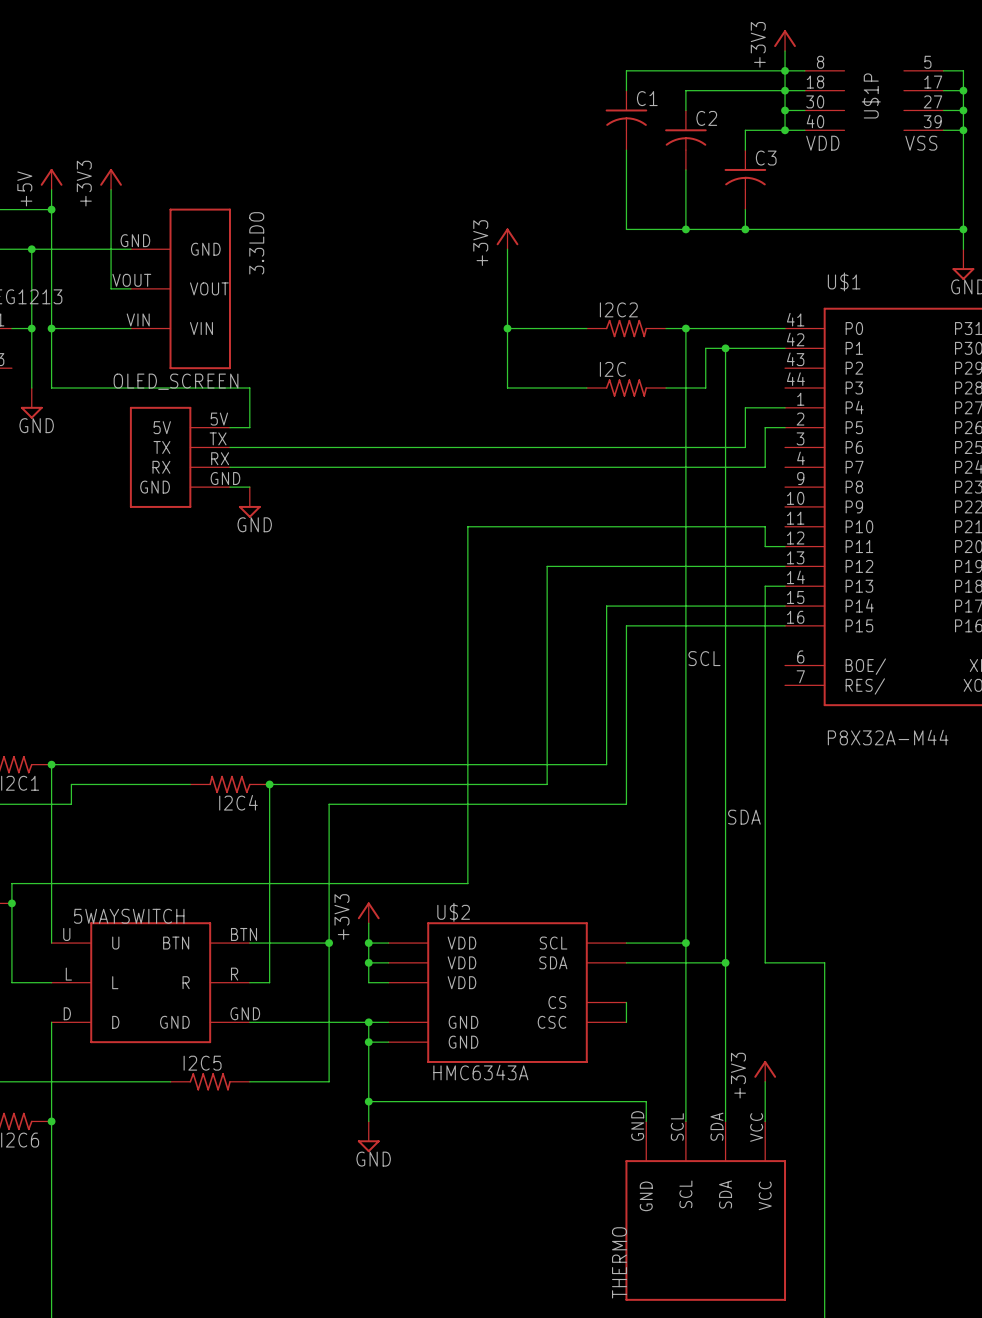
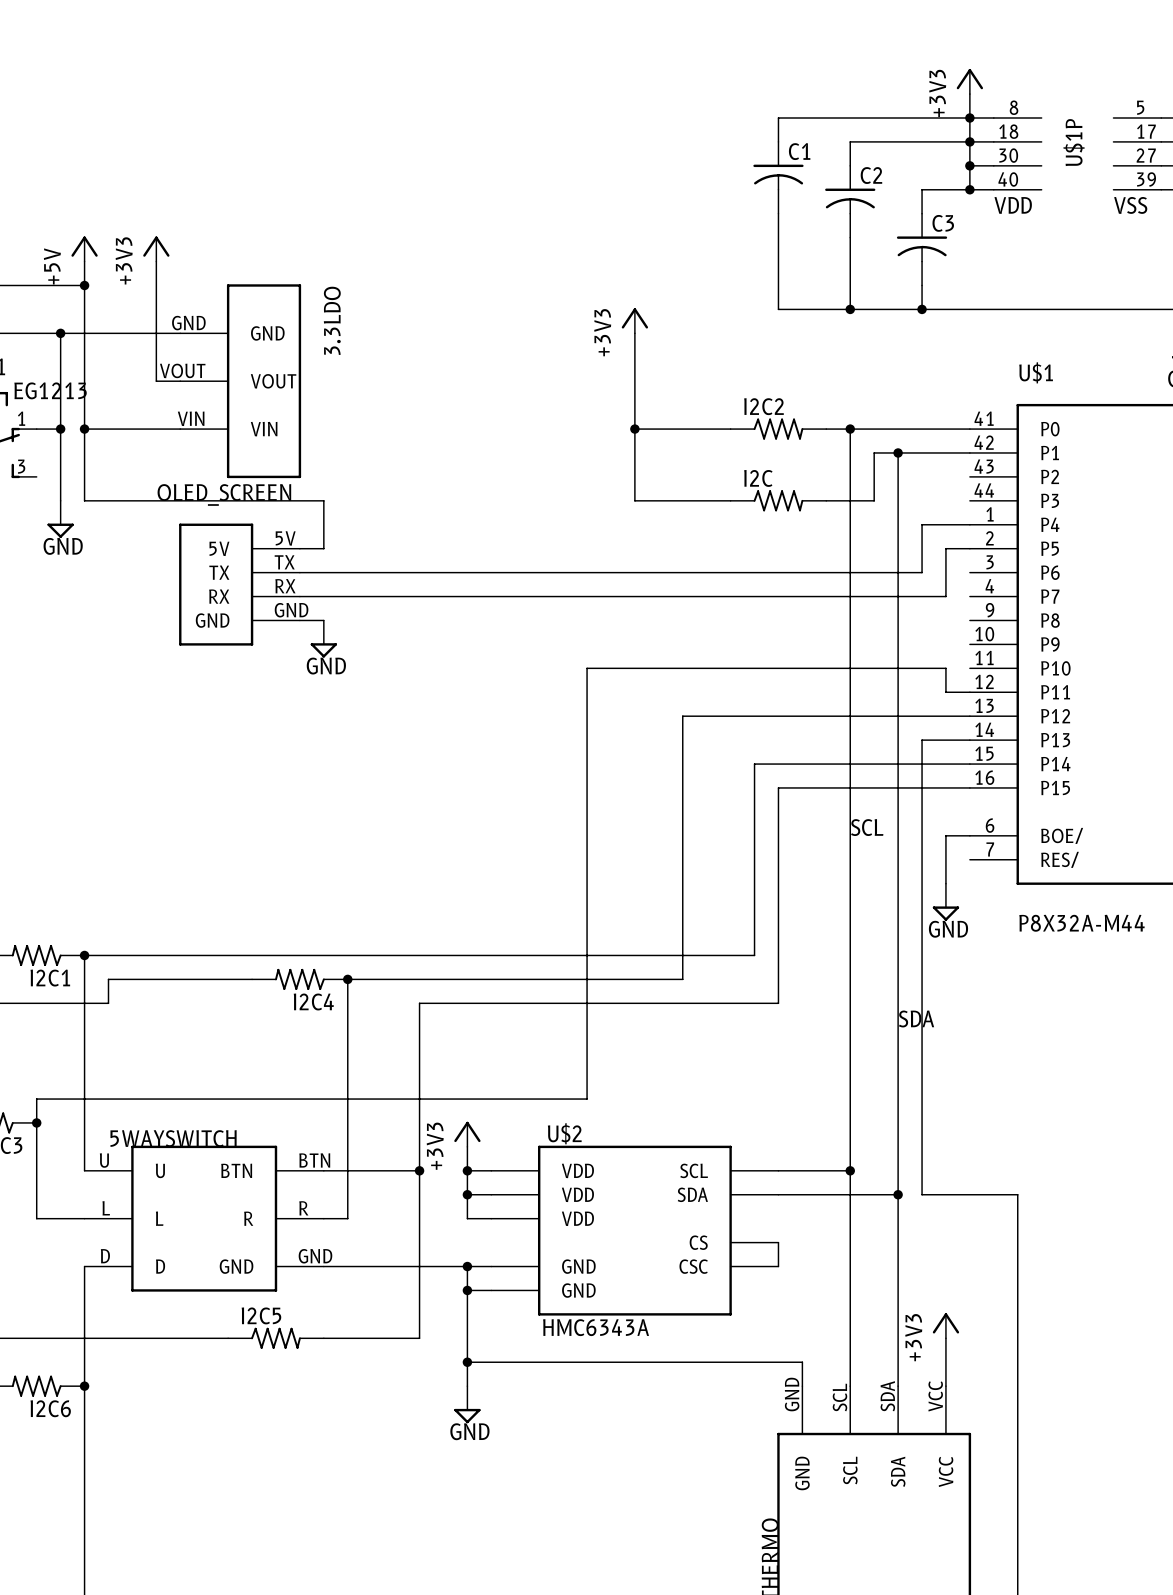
wire: (765, 586) (765, 665) -> (969, 835) (945, 835)
wire: (765, 705) (765, 962) -> (945, 740) (922, 740) (922, 1194) (945, 1194)
power symbol: none -> GND (945, 902)

